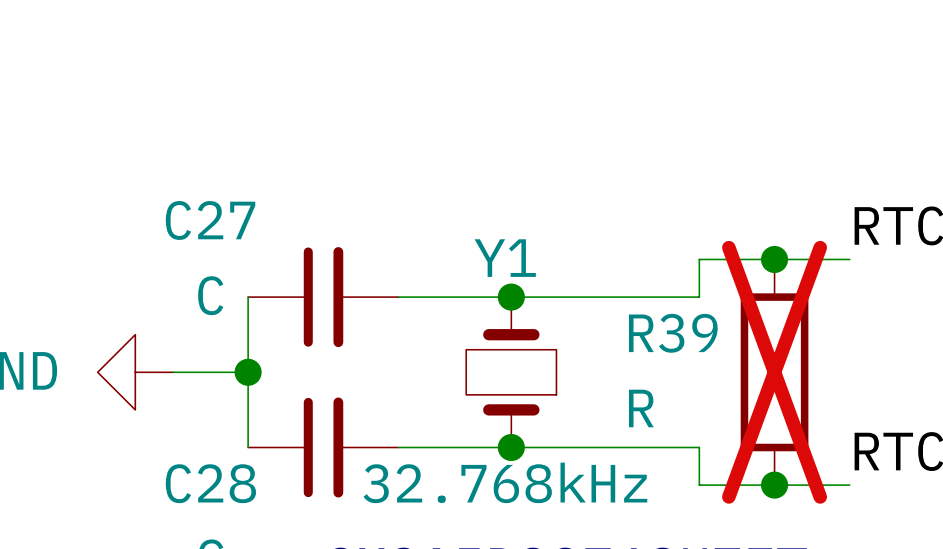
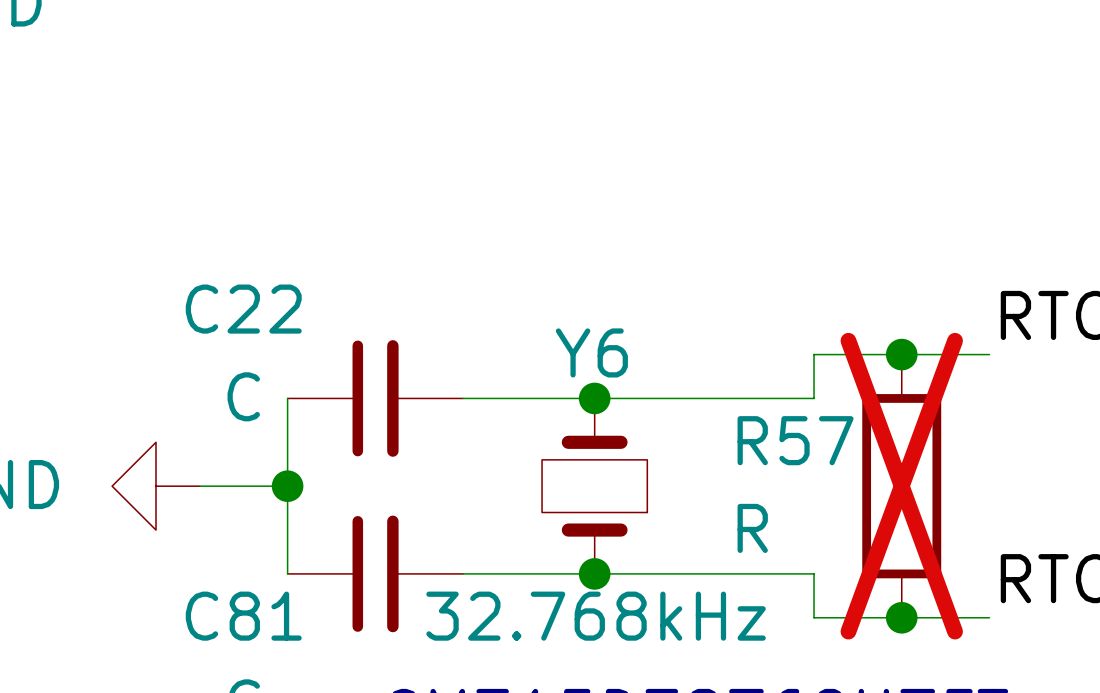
C27 name: C27 (210, 220) -> C22 (243, 309)
Y1 name: Y1 (505, 258) -> Y6 (591, 352)
R39 name: R39 (673, 333) -> R57 (795, 440)
C28 name: C28 (210, 483) -> C81 (243, 616)

